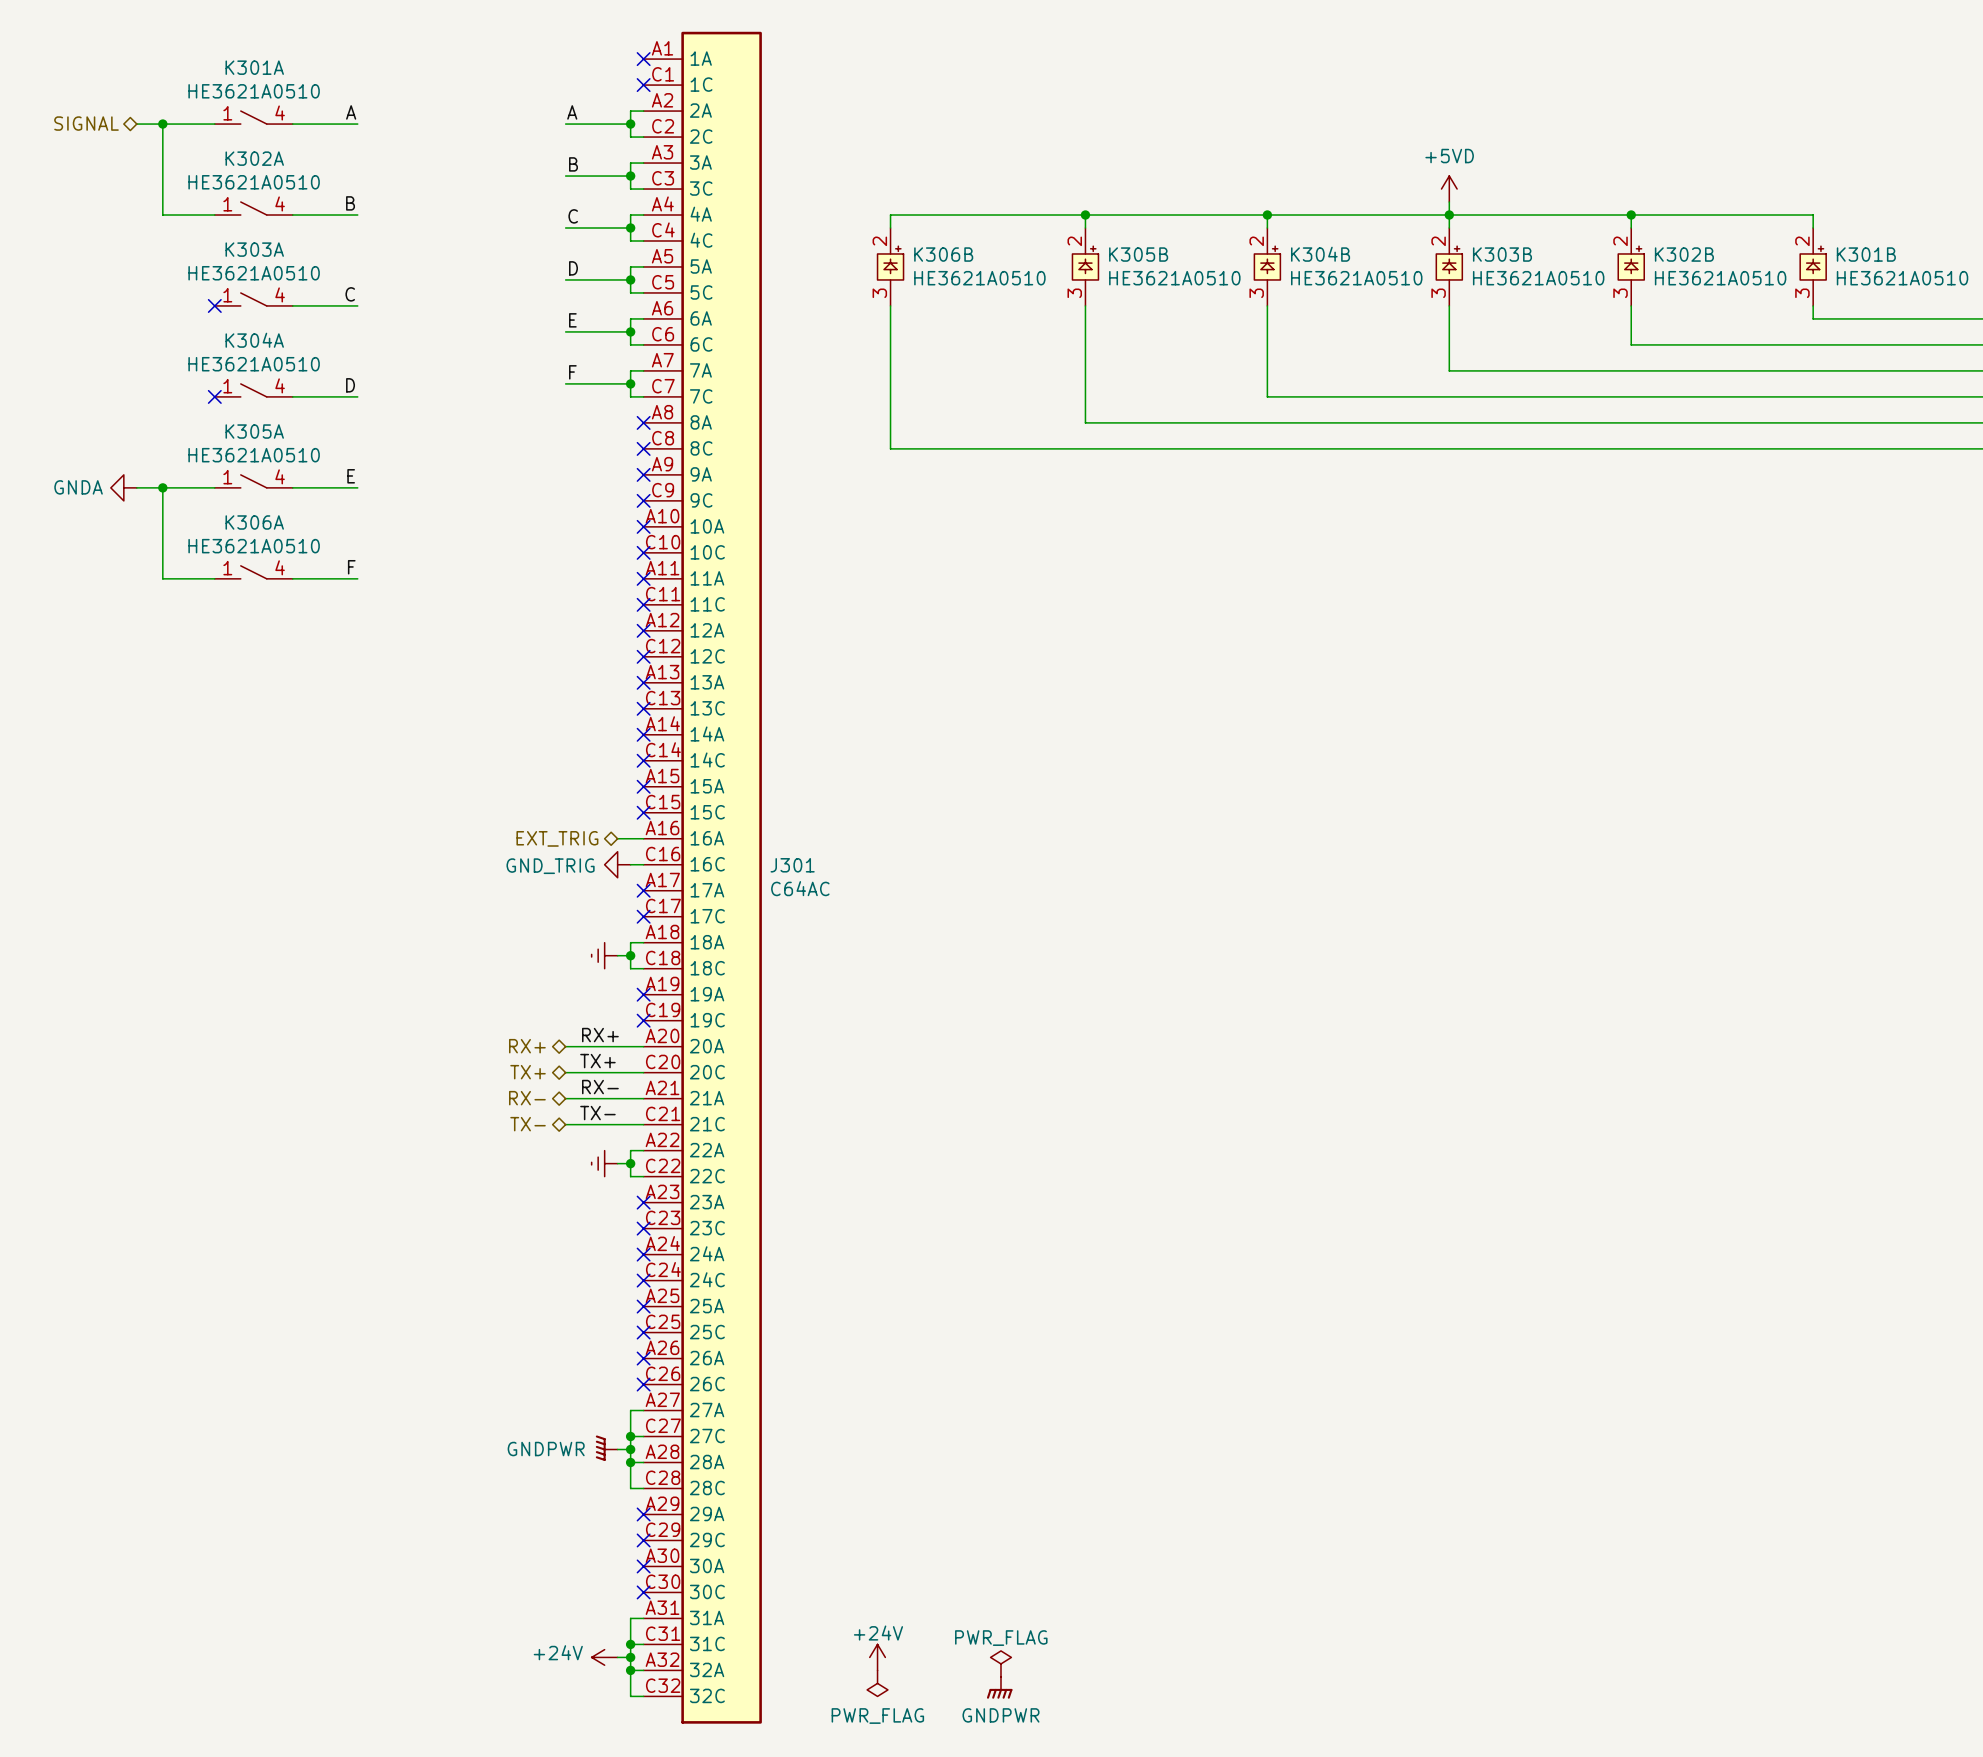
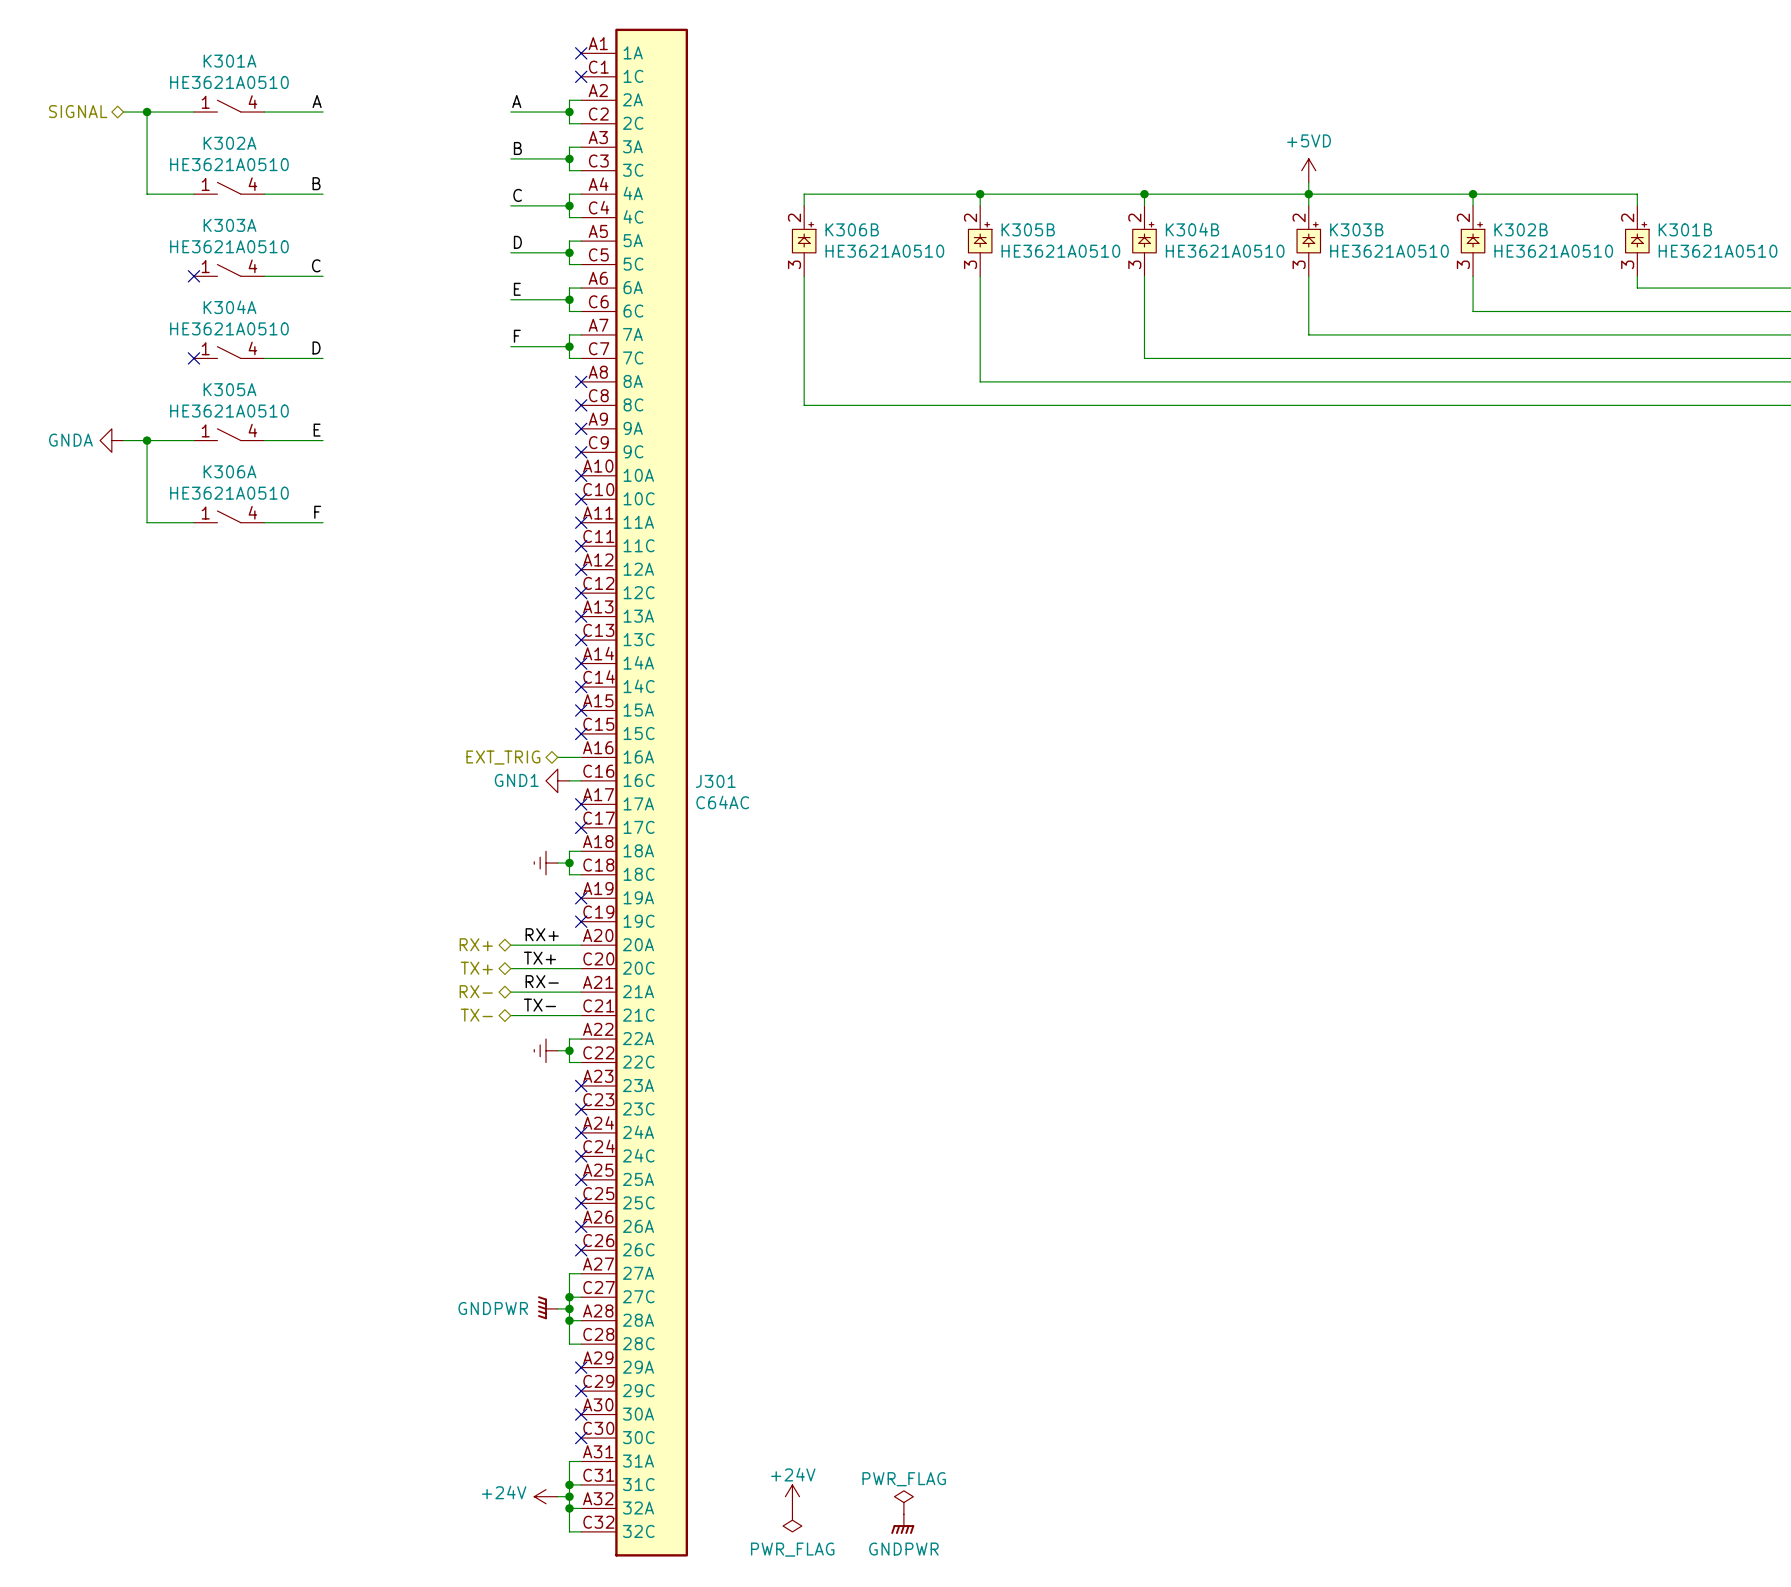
power symbol: GND_TRIG (617, 864) -> GND1 (557, 780)

